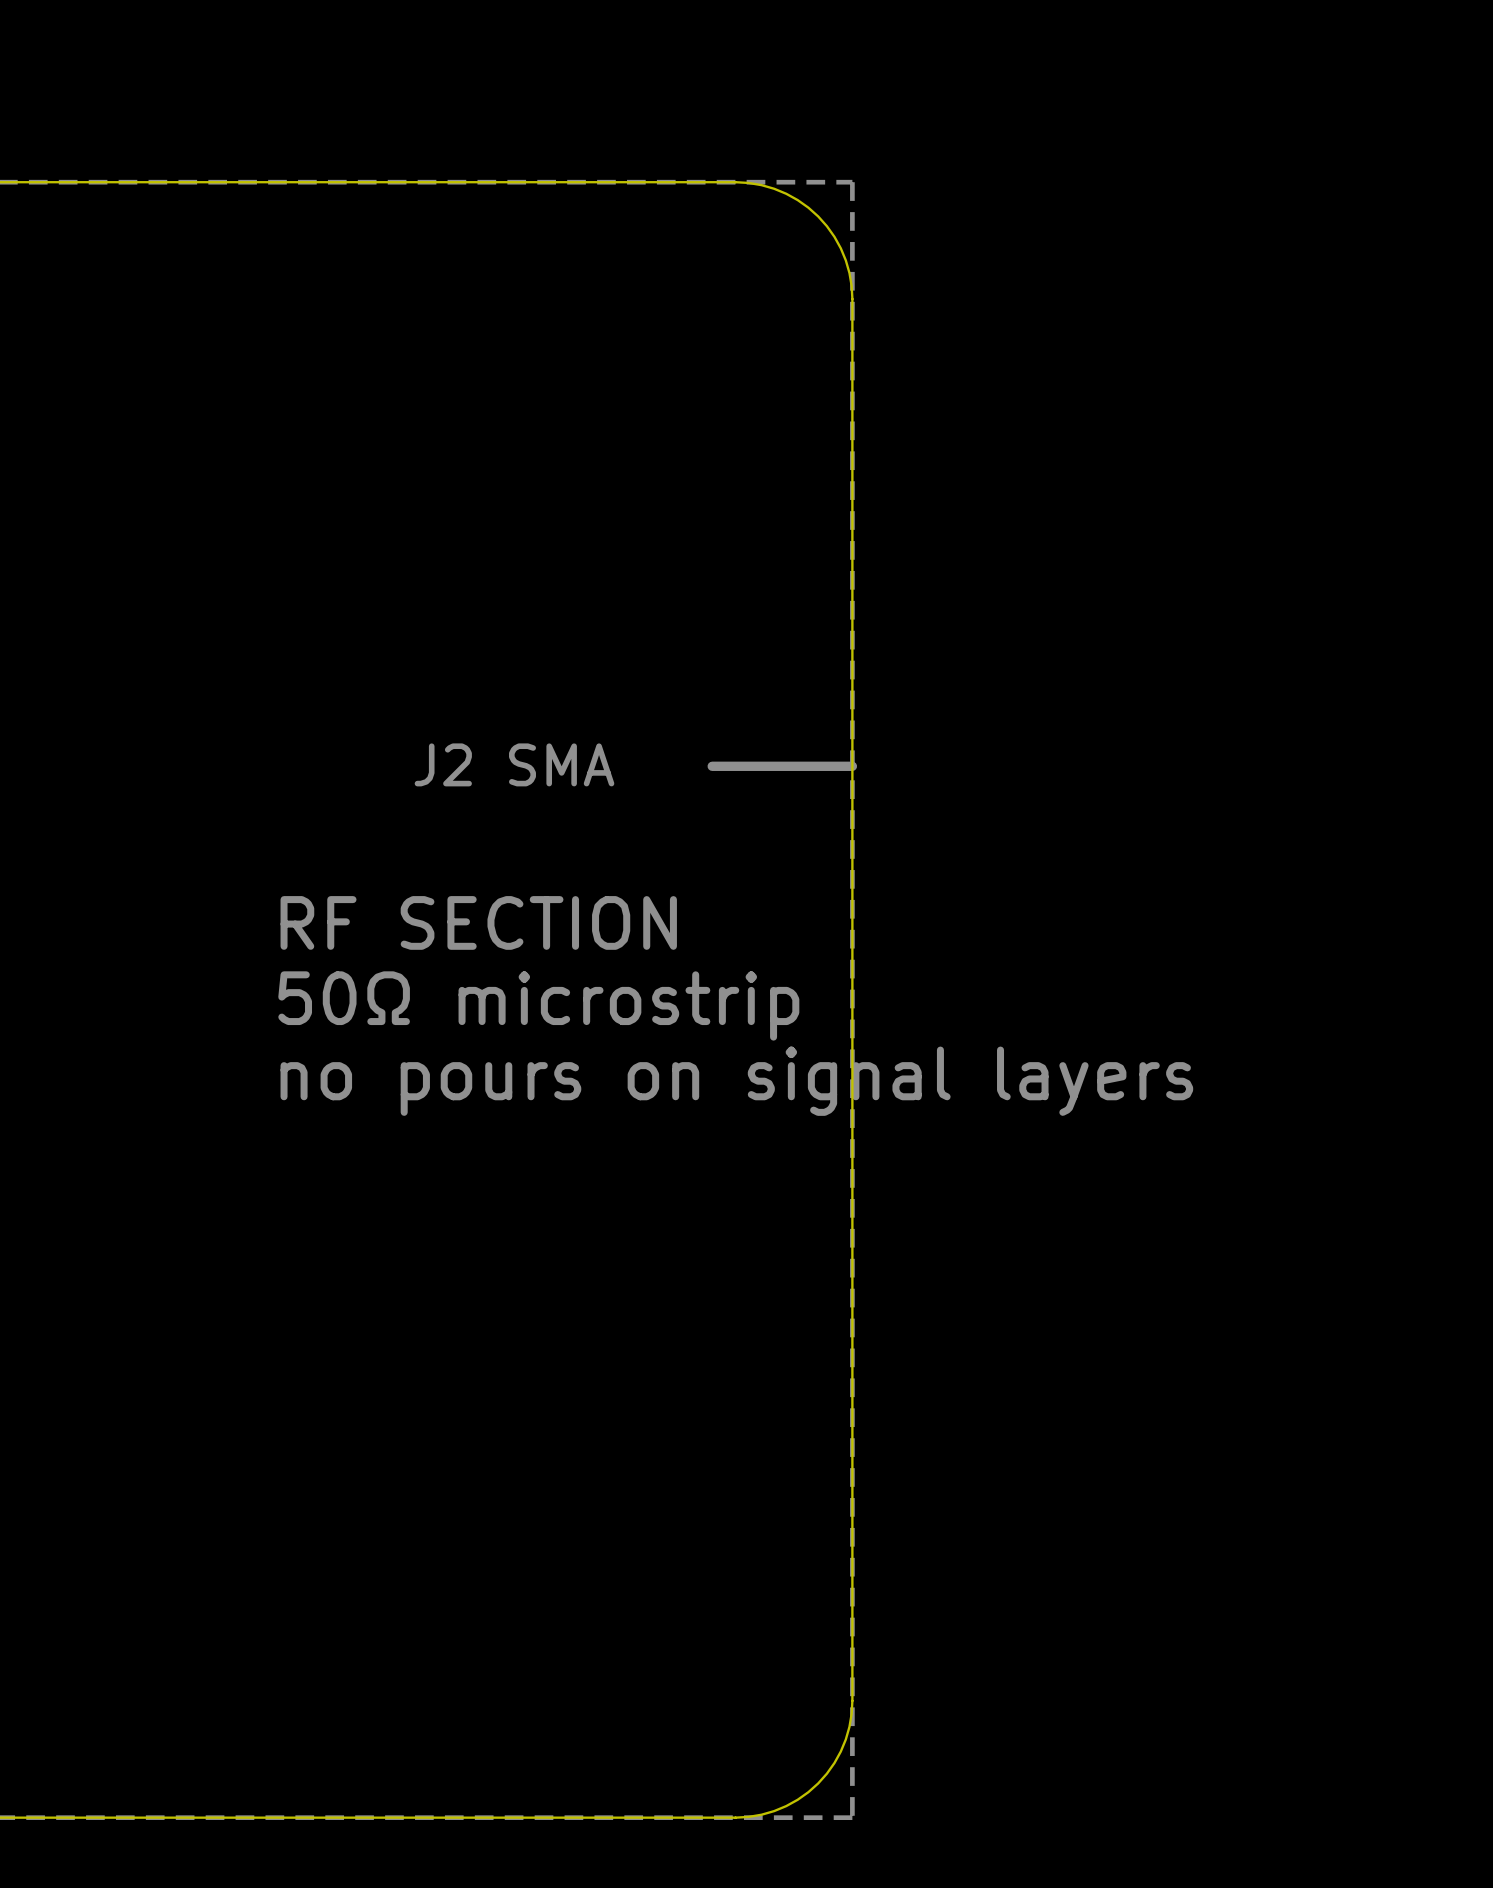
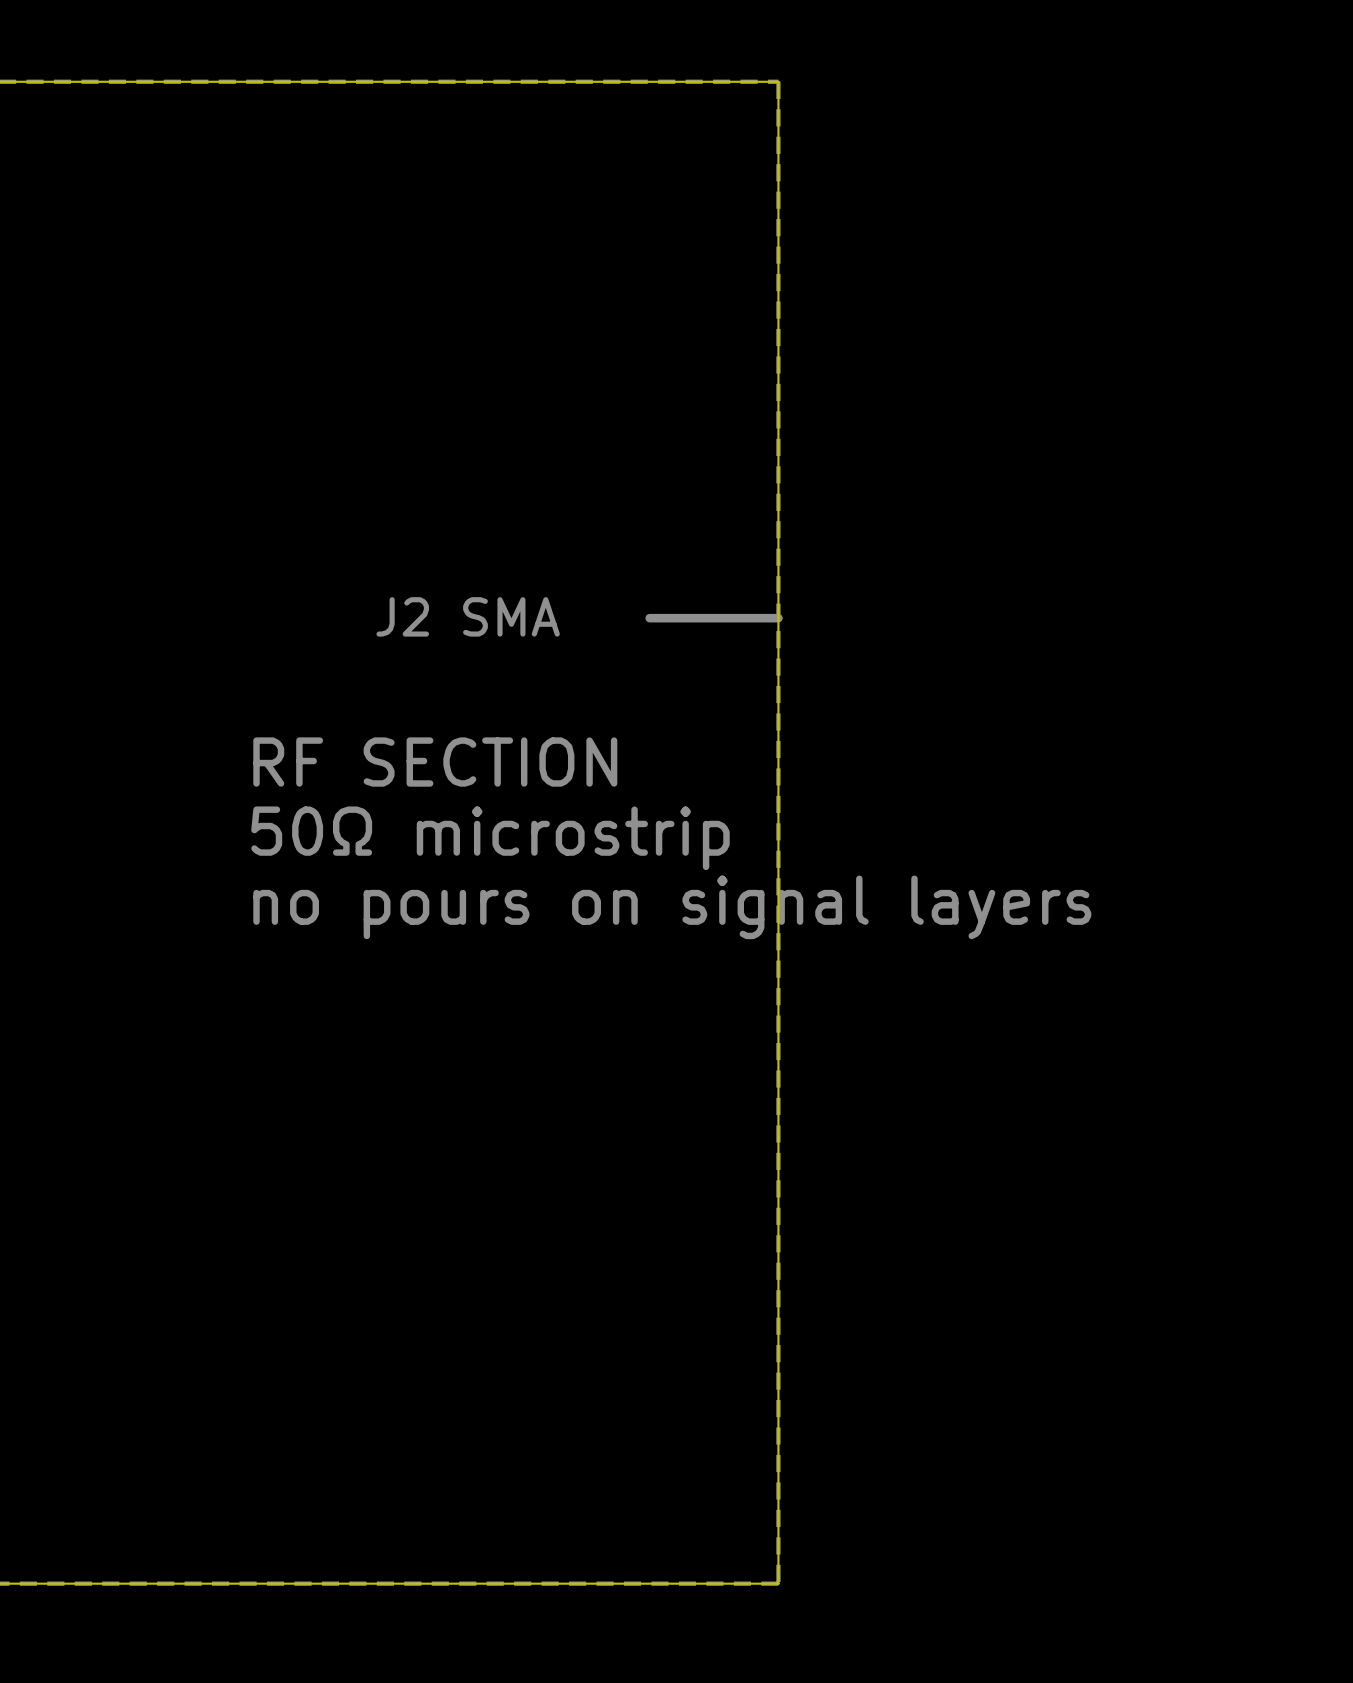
board edge: (735, 182) (774, 188) (797, 200) (818, 216) (834, 236) (845, 260) (852, 299) -> (671, 81) (778, 81) (778, 189)
board edge: (852, 1700) (845, 1739) (834, 1762) (818, 1783) (786, 1806) (761, 1814) (735, 1817) -> (778, 1476) (778, 1583) (671, 1583)

